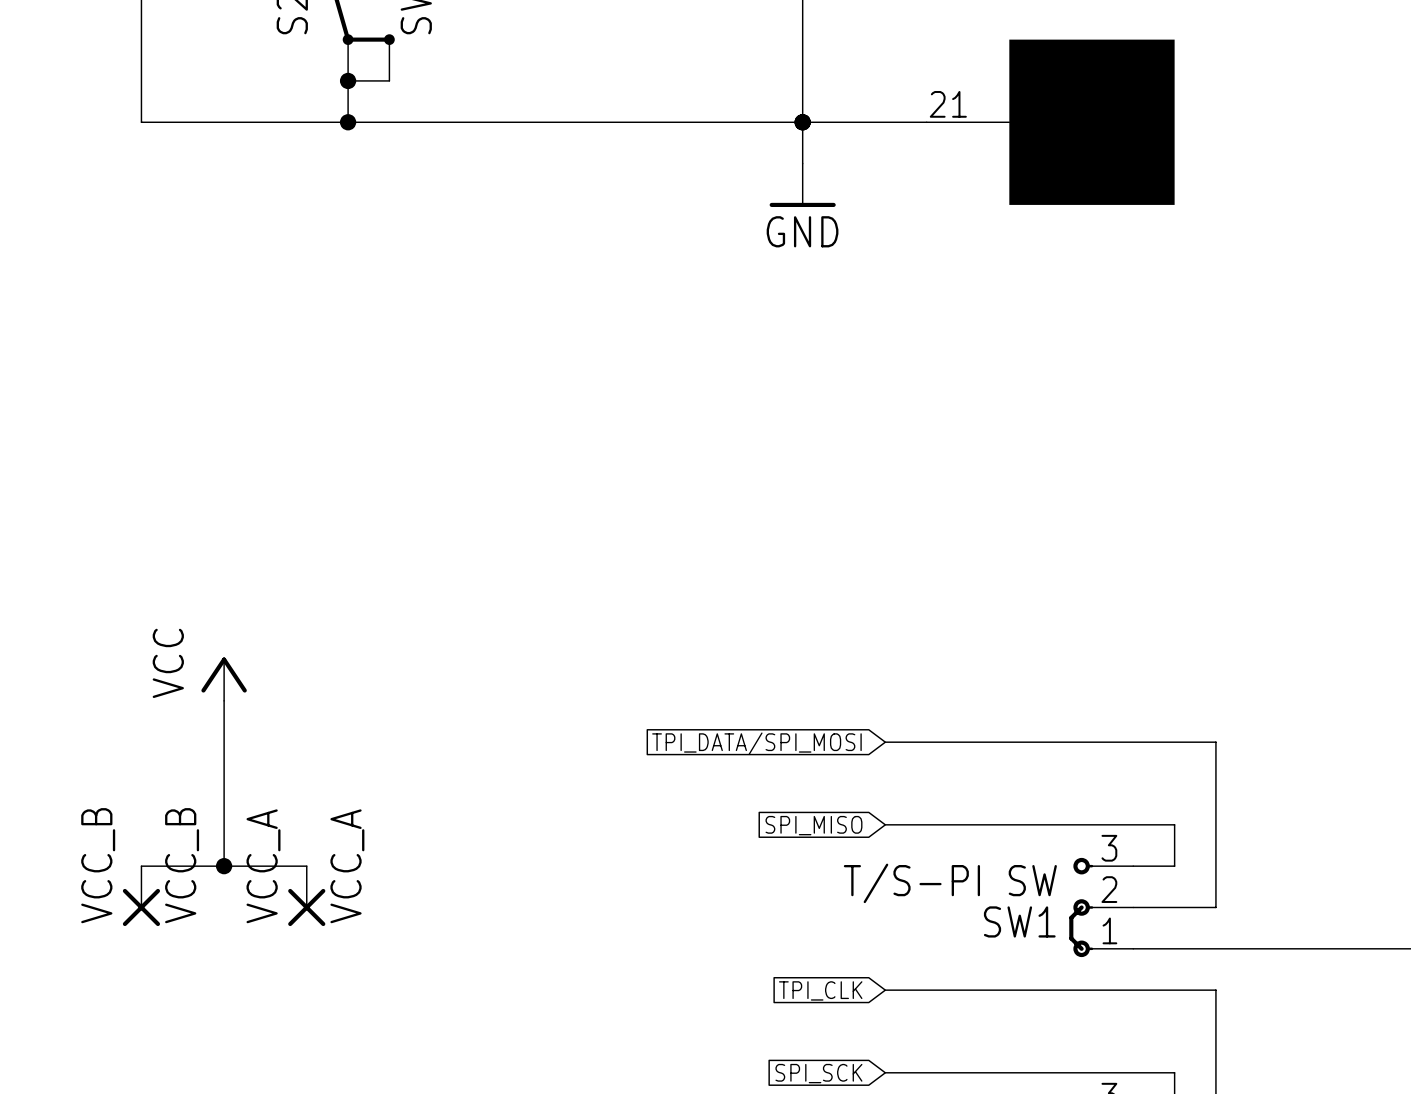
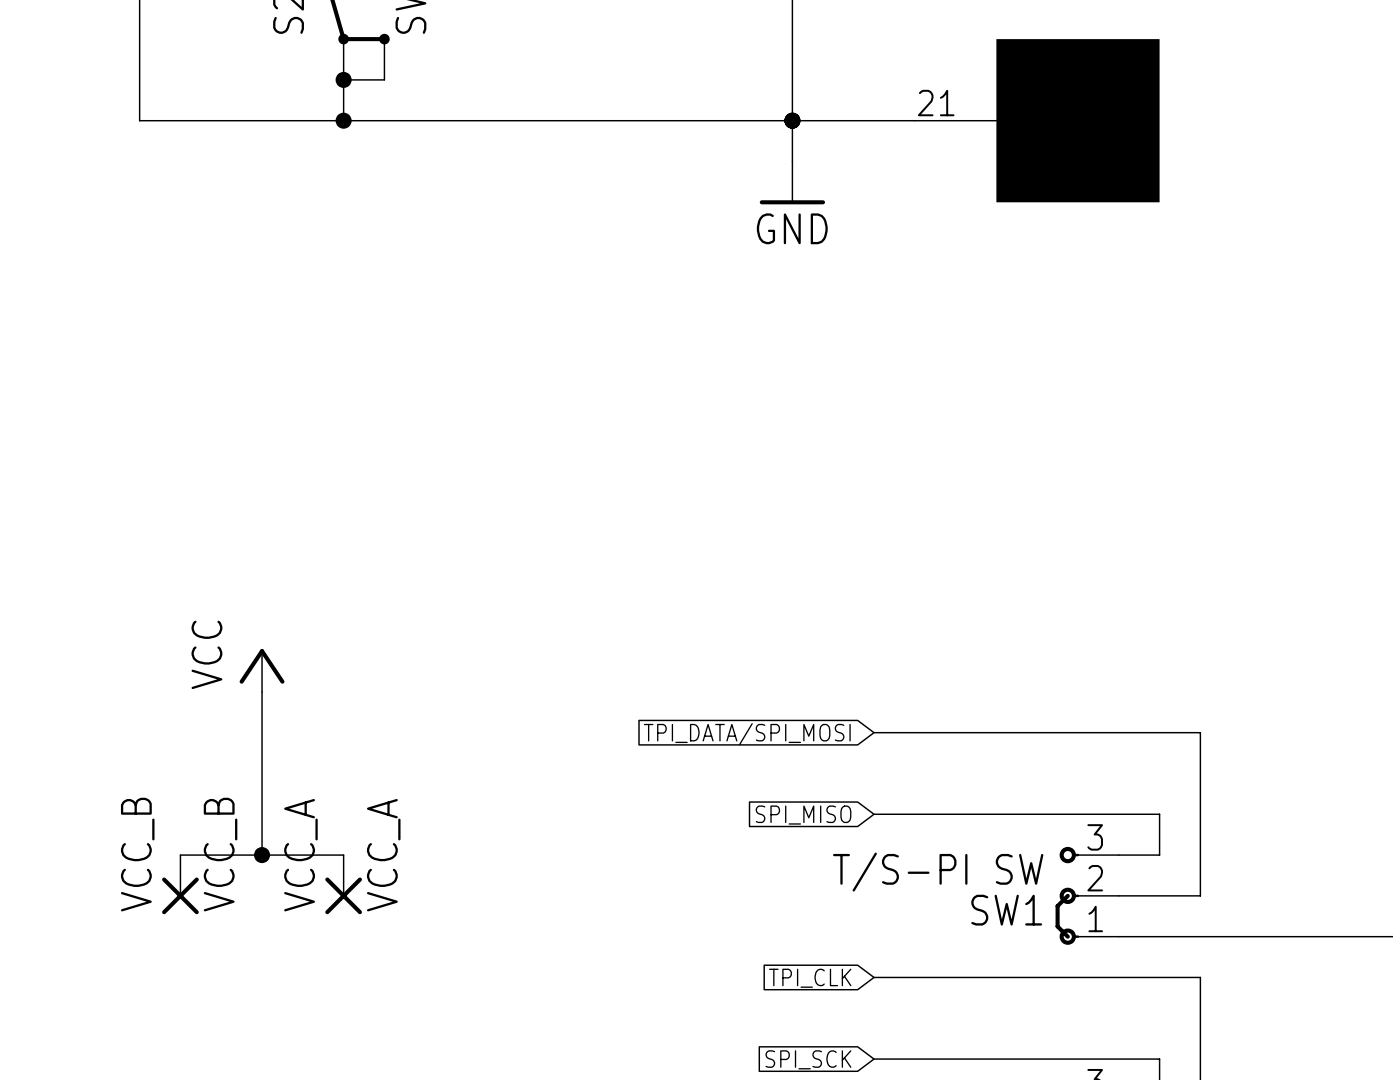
power symbol position: VCC (224, 679) -> VCC (262, 670)
wire: (224, 700) (224, 866) -> (262, 691) (262, 855)
wire: (141, 866) (182, 866) -> (302, 855) (343, 855)
junction position: (224, 866) -> (262, 855)
VCC_B position: (141, 896) -> (180, 884)
VCC_A position: (306, 896) -> (343, 884)

